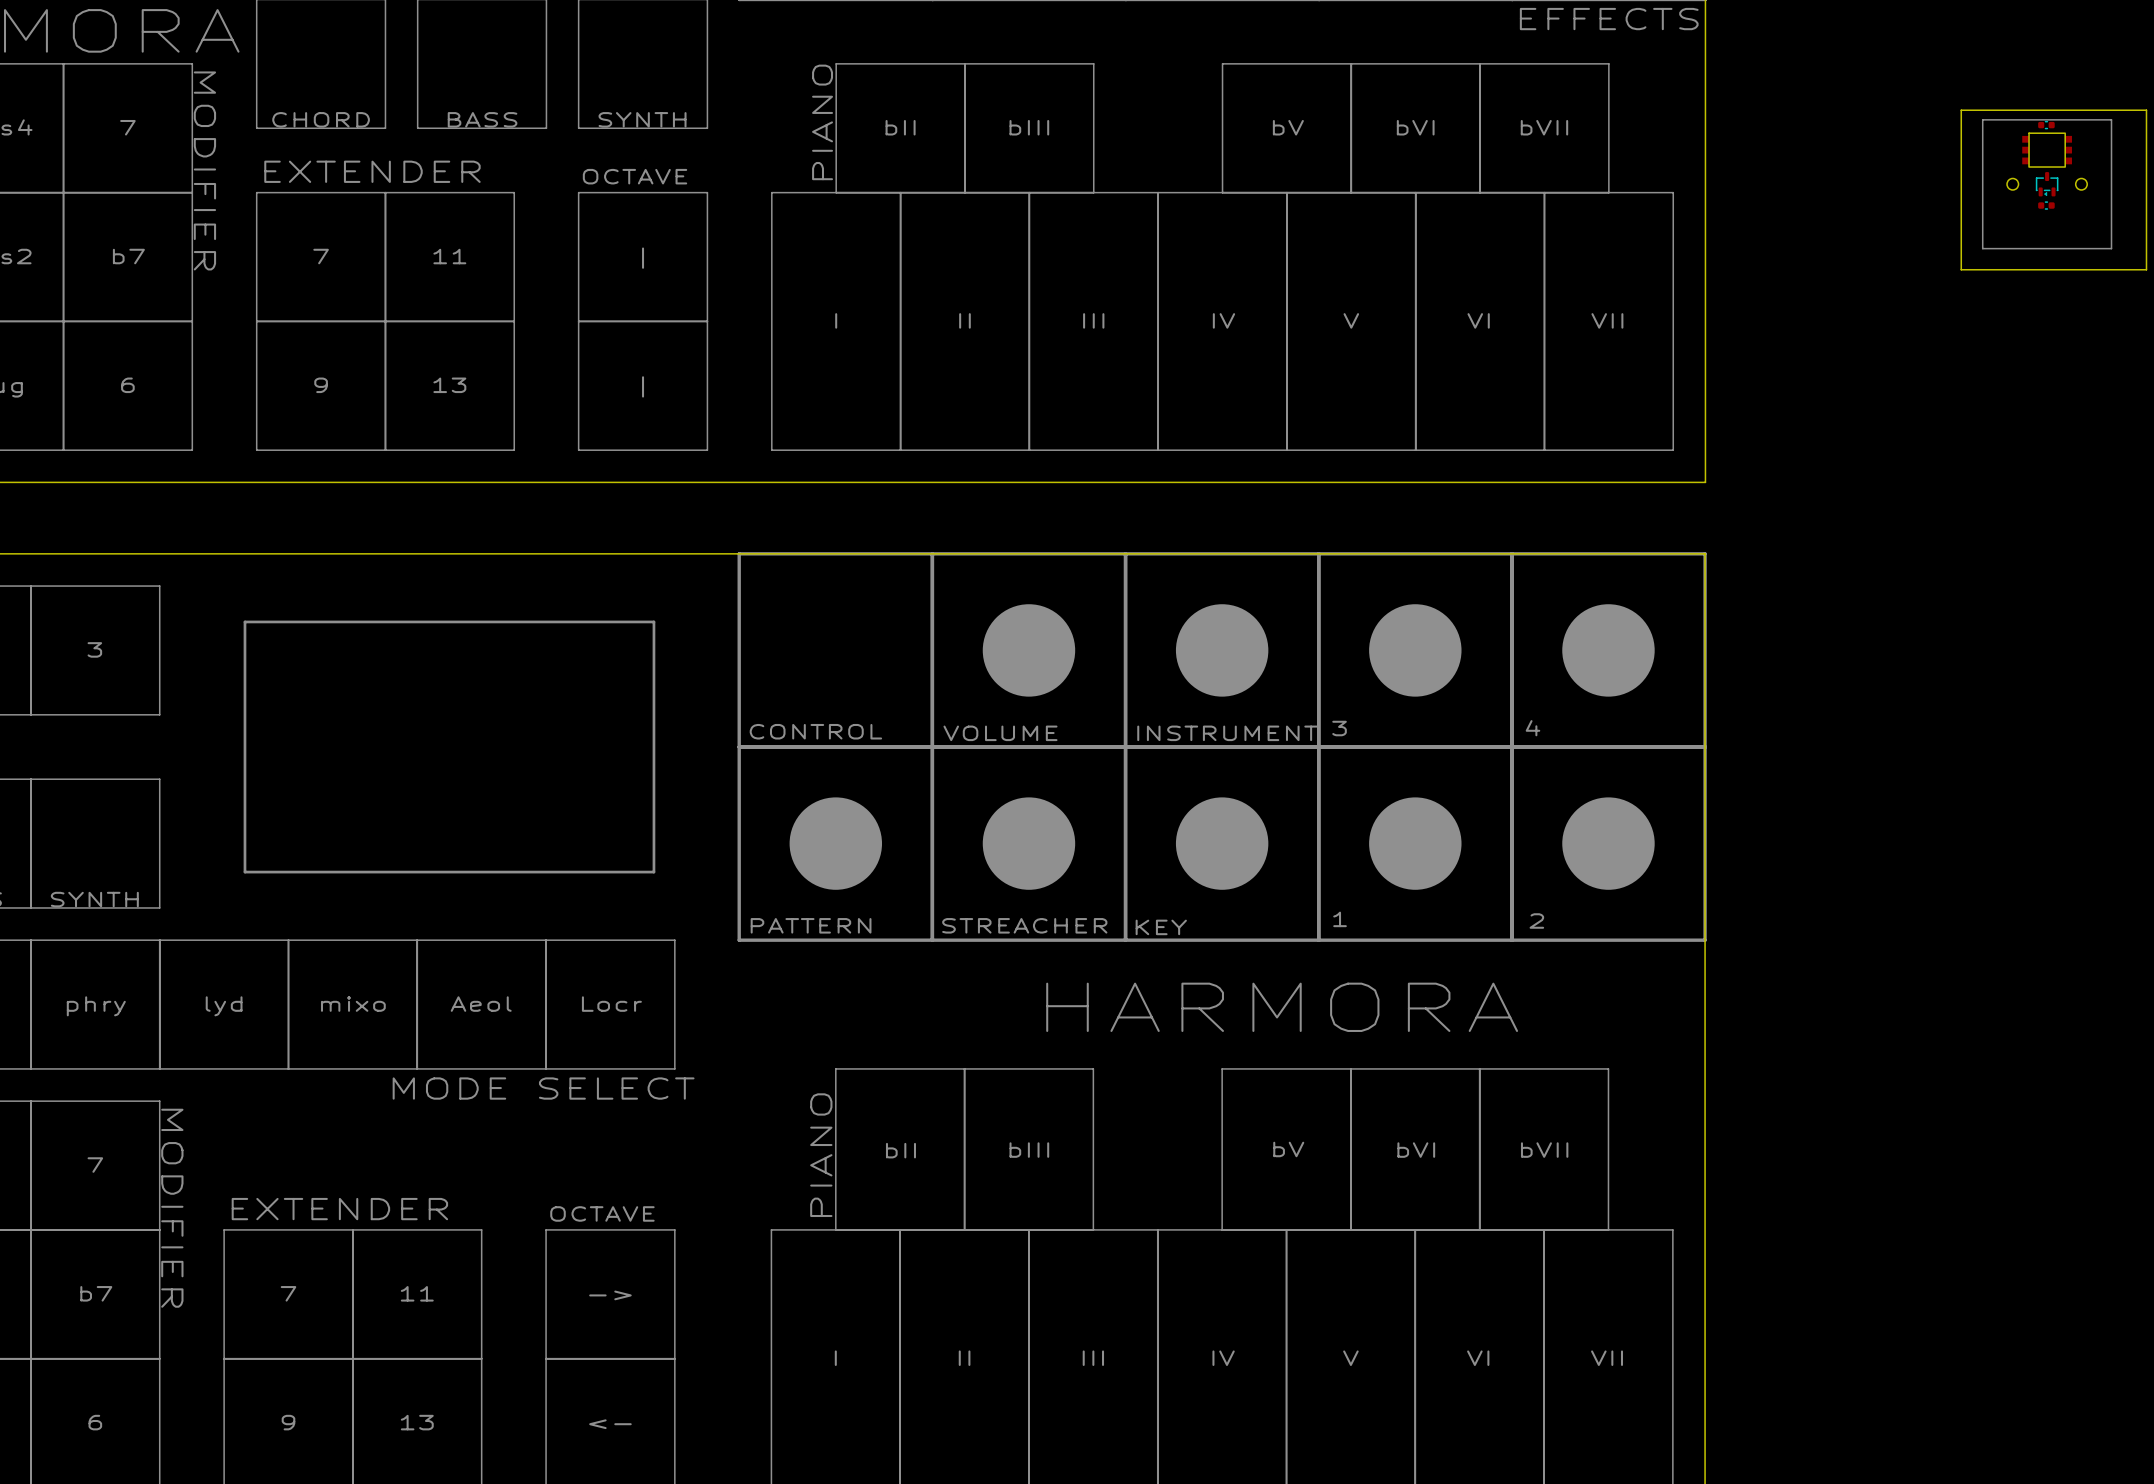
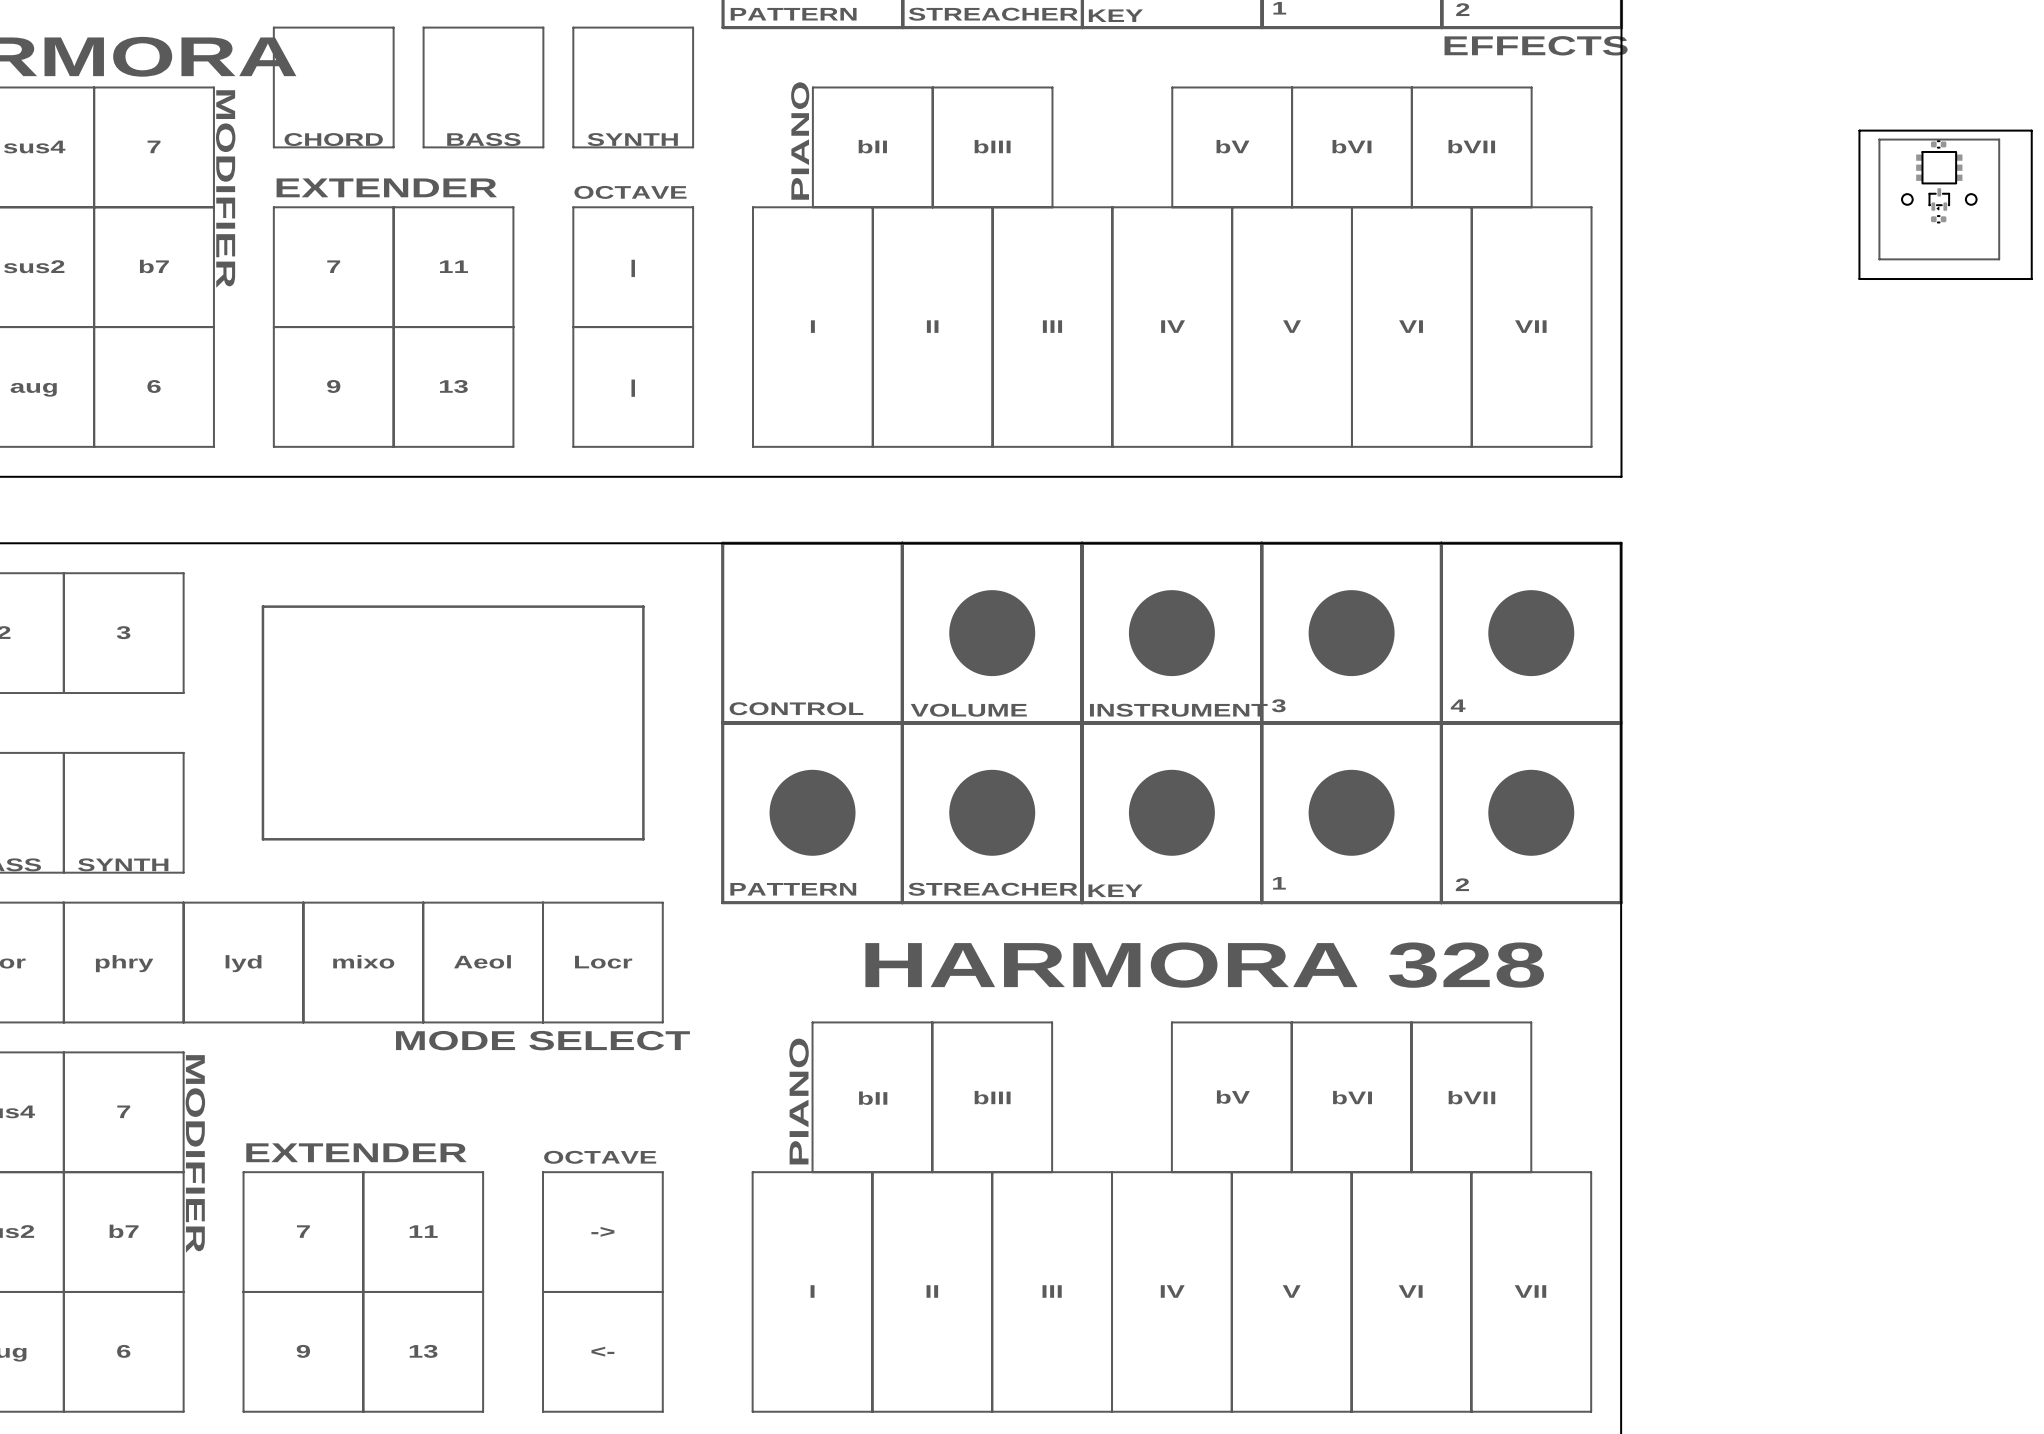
text: HARMORA (1282, 1007) -> HARMORA 328 (1204, 965)

